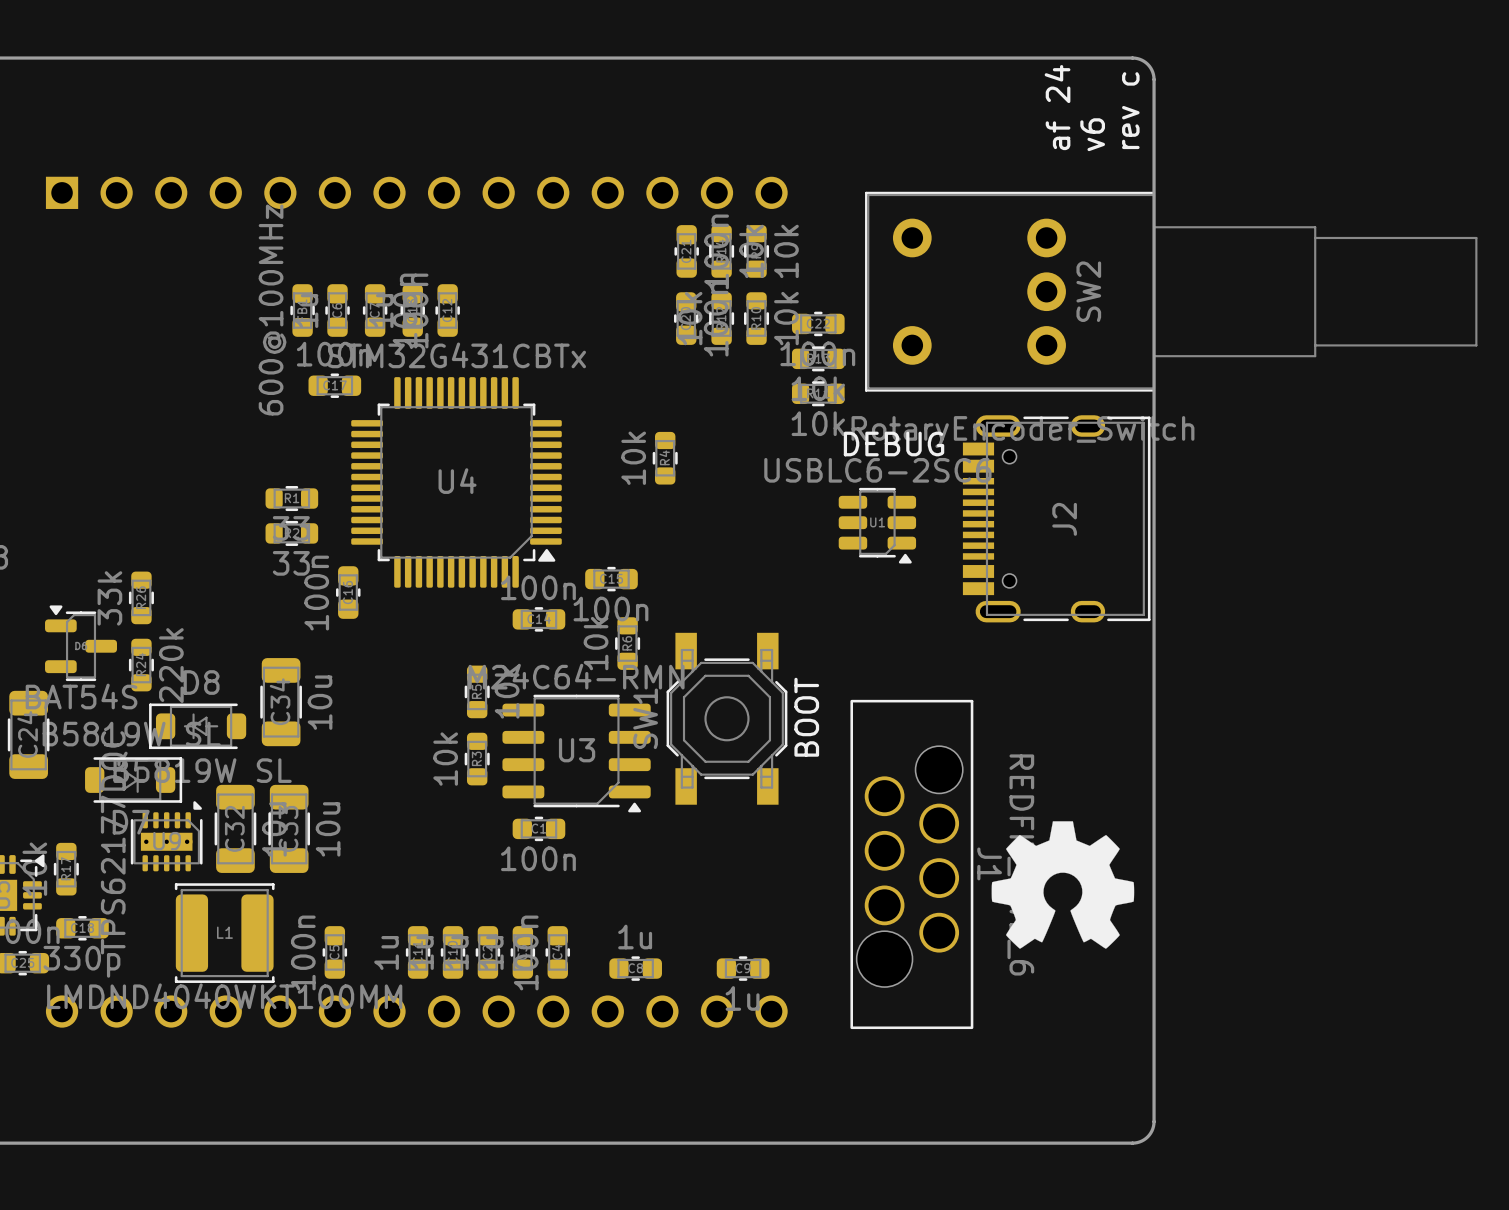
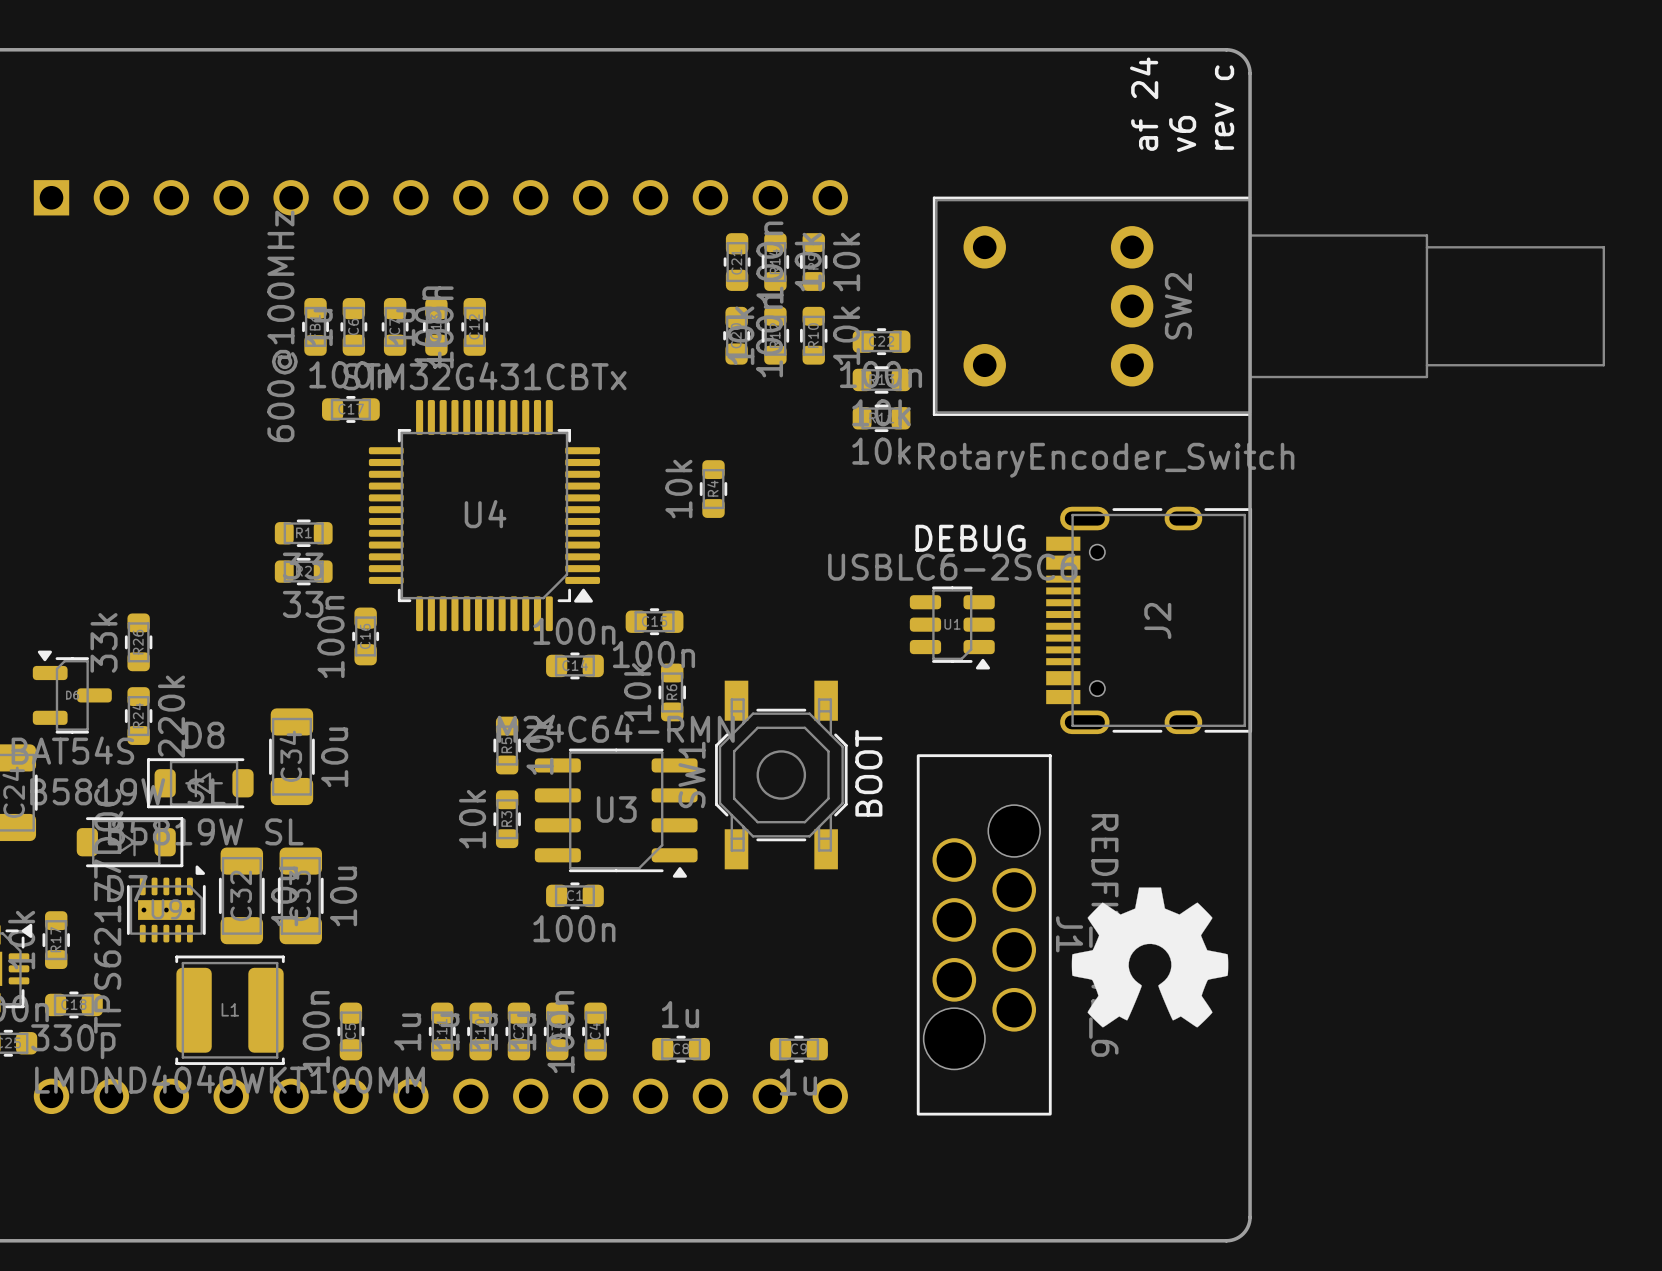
J2 position: (1056, 518) -> (1149, 620)
U1 position: (877, 525) -> (952, 627)

